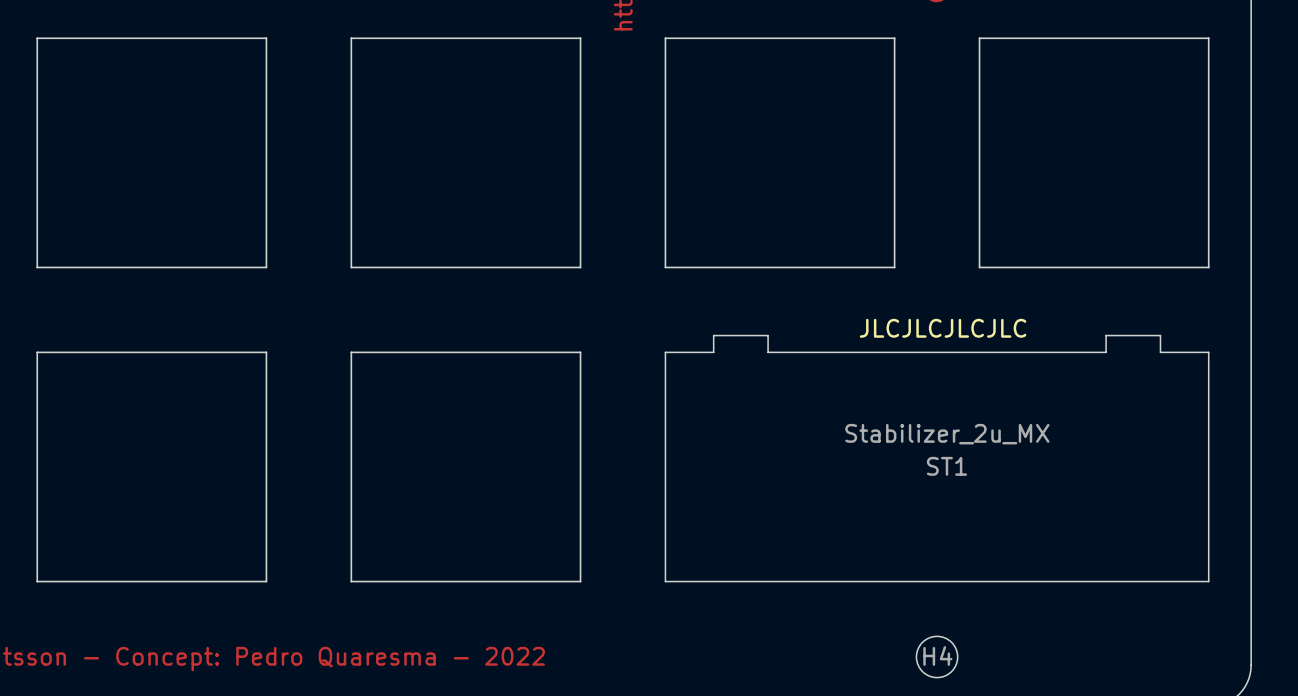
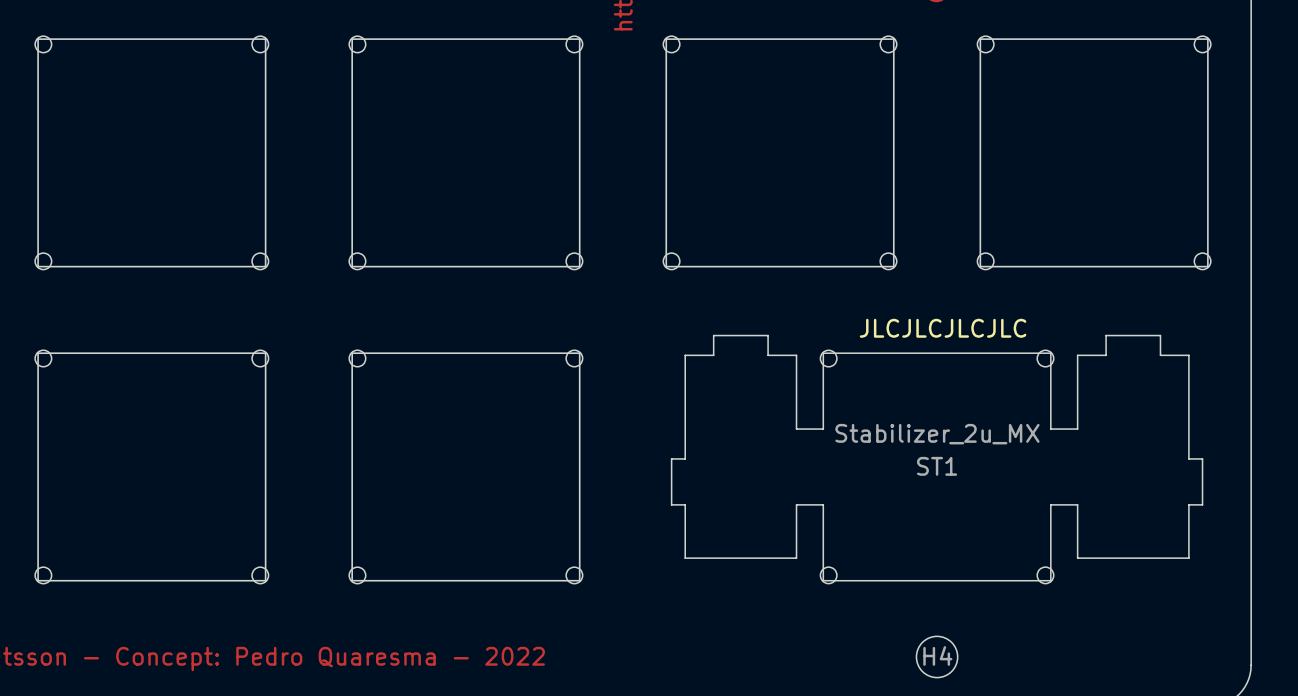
drawing: [36, 37, 268, 269] -> none
drawing: [350, 37, 582, 269] -> none
drawing: [664, 37, 896, 269] -> none
drawing: [978, 37, 1210, 269] -> none
part: none -> (151, 152)
part: none -> (465, 152)
part: none -> (780, 152)
part: none -> (1094, 152)
ST1 footprint: [665, 335, 1210, 582] -> [671, 335, 1203, 584]
drawing: [36, 351, 268, 583] -> none
drawing: [350, 351, 582, 583] -> none
part: none -> (151, 466)
part: none -> (465, 466)

